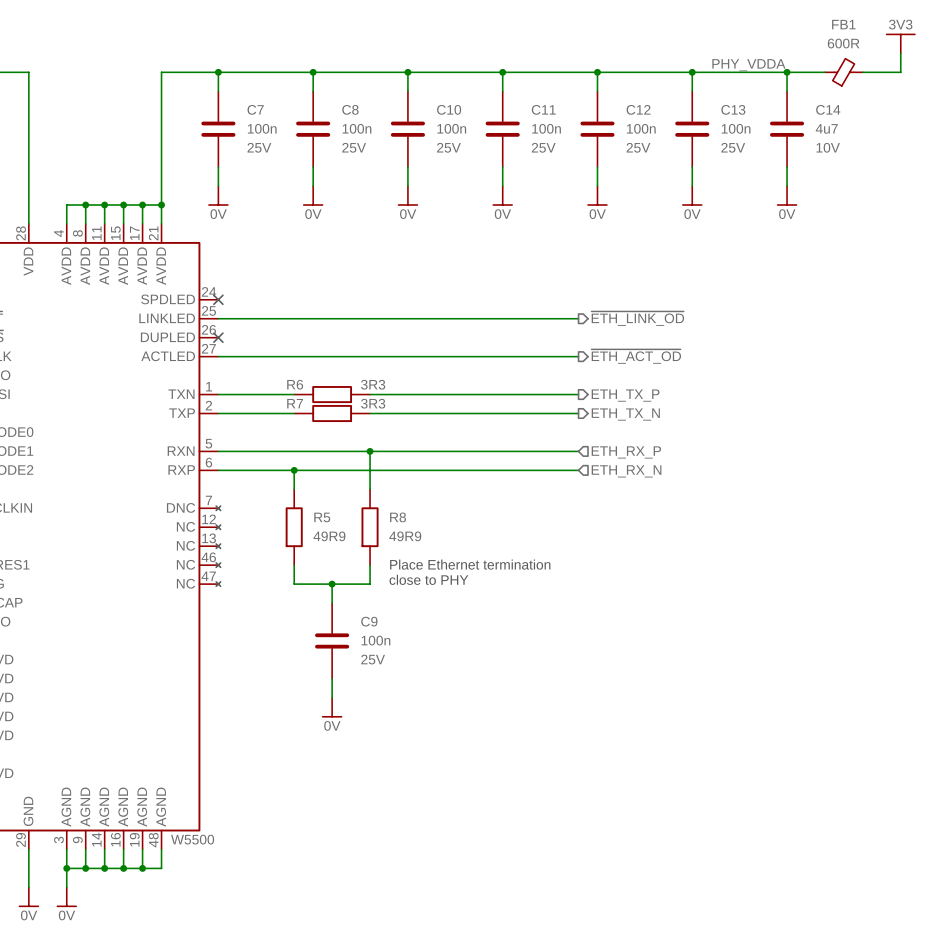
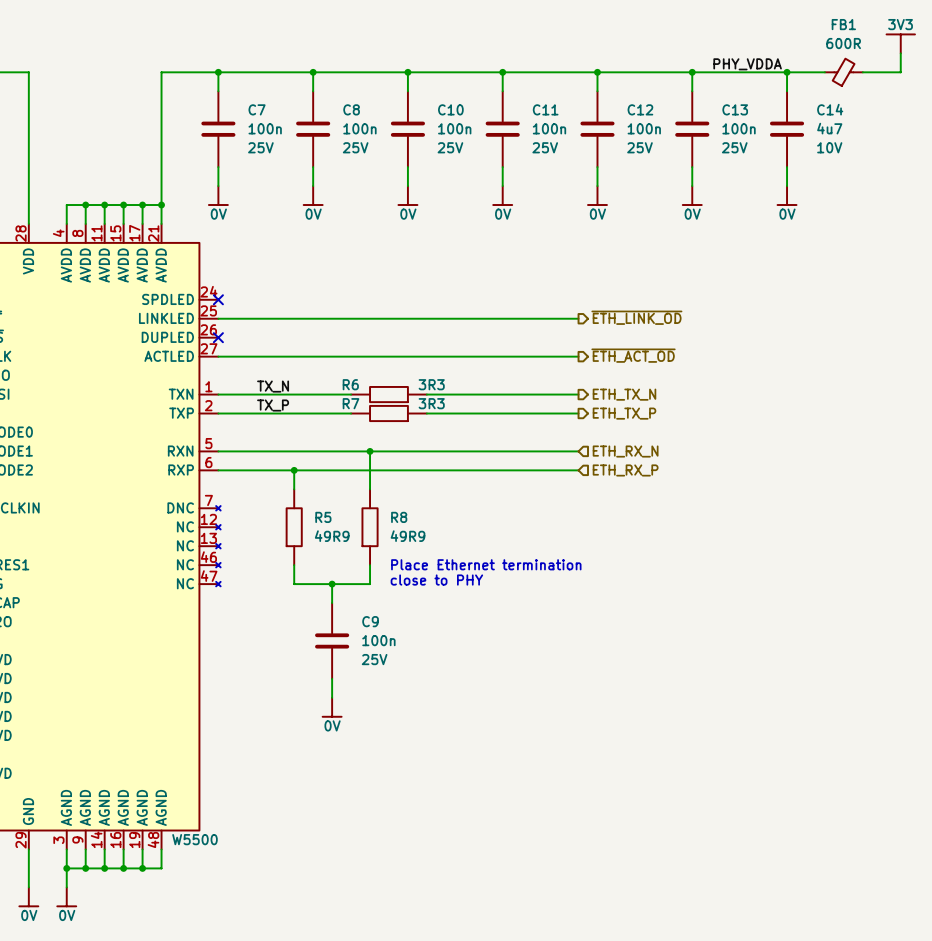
label: none -> TX_N (273, 386)
R6 position: (332, 394) -> (388, 394)
wire: (370, 394) (426, 394) -> (294, 394) (351, 394)
hierarchical label: ETH_TX_P (625, 395) -> ETH_TX_N (624, 394)
label: none -> TX_P (273, 405)
R7 position: (332, 413) -> (388, 413)
wire: (370, 413) (426, 413) -> (294, 413) (351, 413)
hierarchical label: ETH_TX_N (625, 414) -> ETH_TX_P (624, 413)
hierarchical label: ETH_RX_P (626, 452) -> ETH_RX_N (625, 451)
hierarchical label: ETH_RX_N (626, 471) -> ETH_RX_P (625, 470)

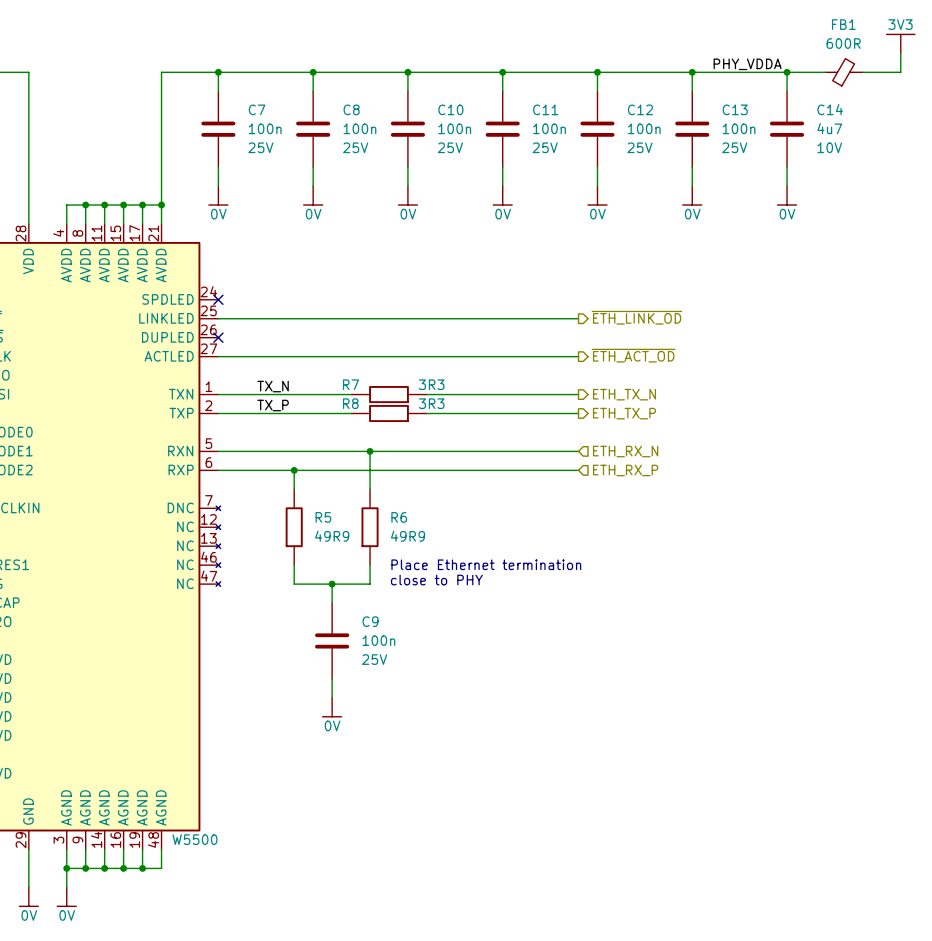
R6 name: R6 (350, 384) -> R7 (351, 384)
R7 name: R7 (351, 403) -> R8 (350, 403)
R8 name: R8 (399, 517) -> R6 (399, 517)

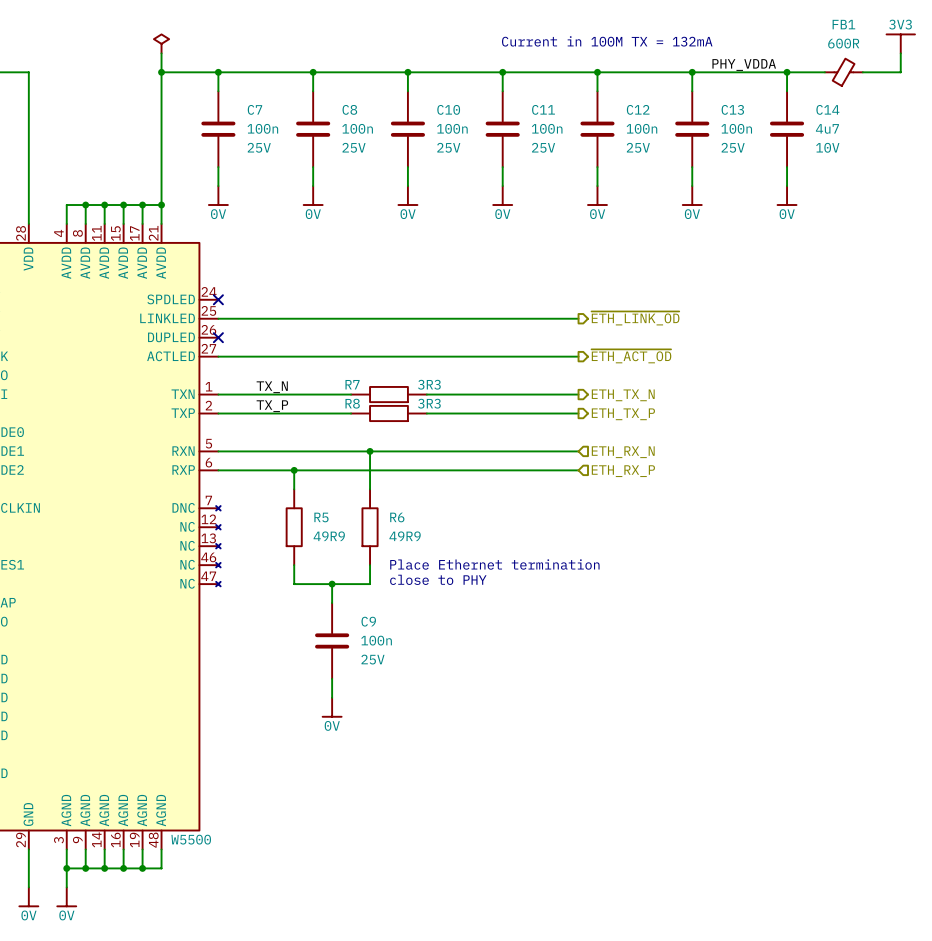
text: none -> Current in 100M TX = 132mA (607, 41)
power symbol: none -> (161, 43)
wire: none -> (161, 53) (161, 72)
junction: none -> (161, 72)

